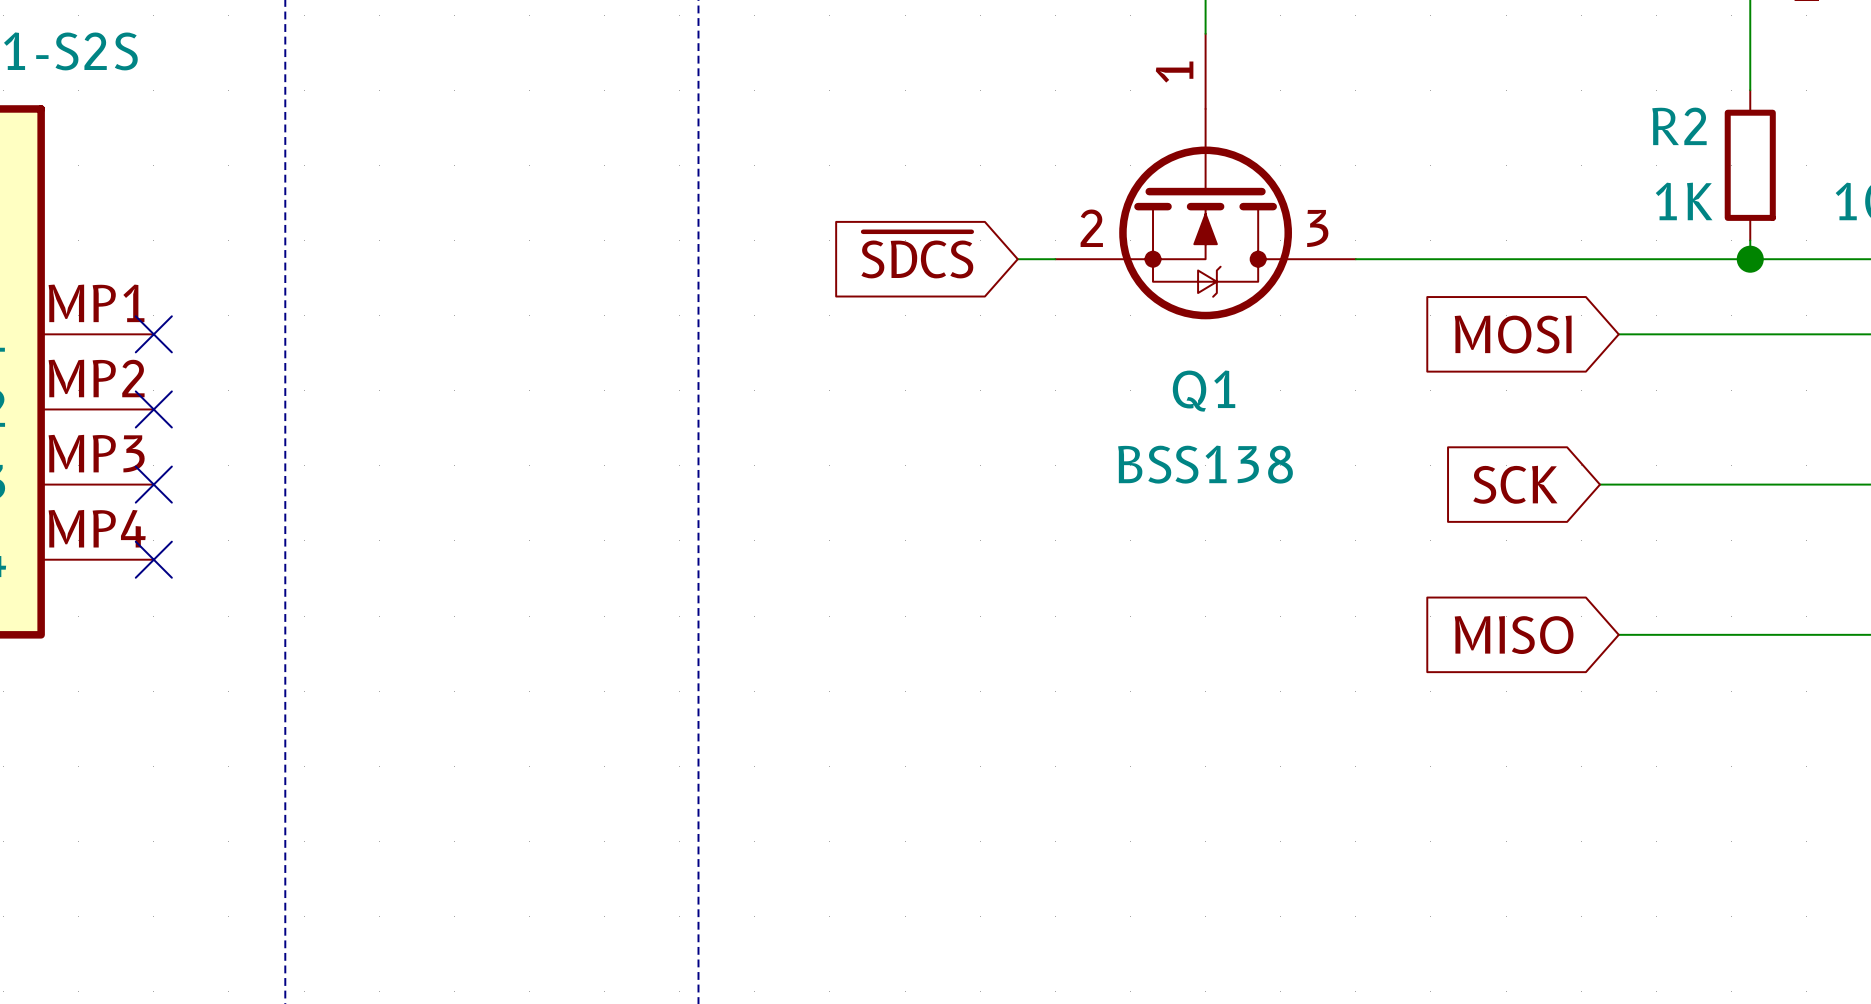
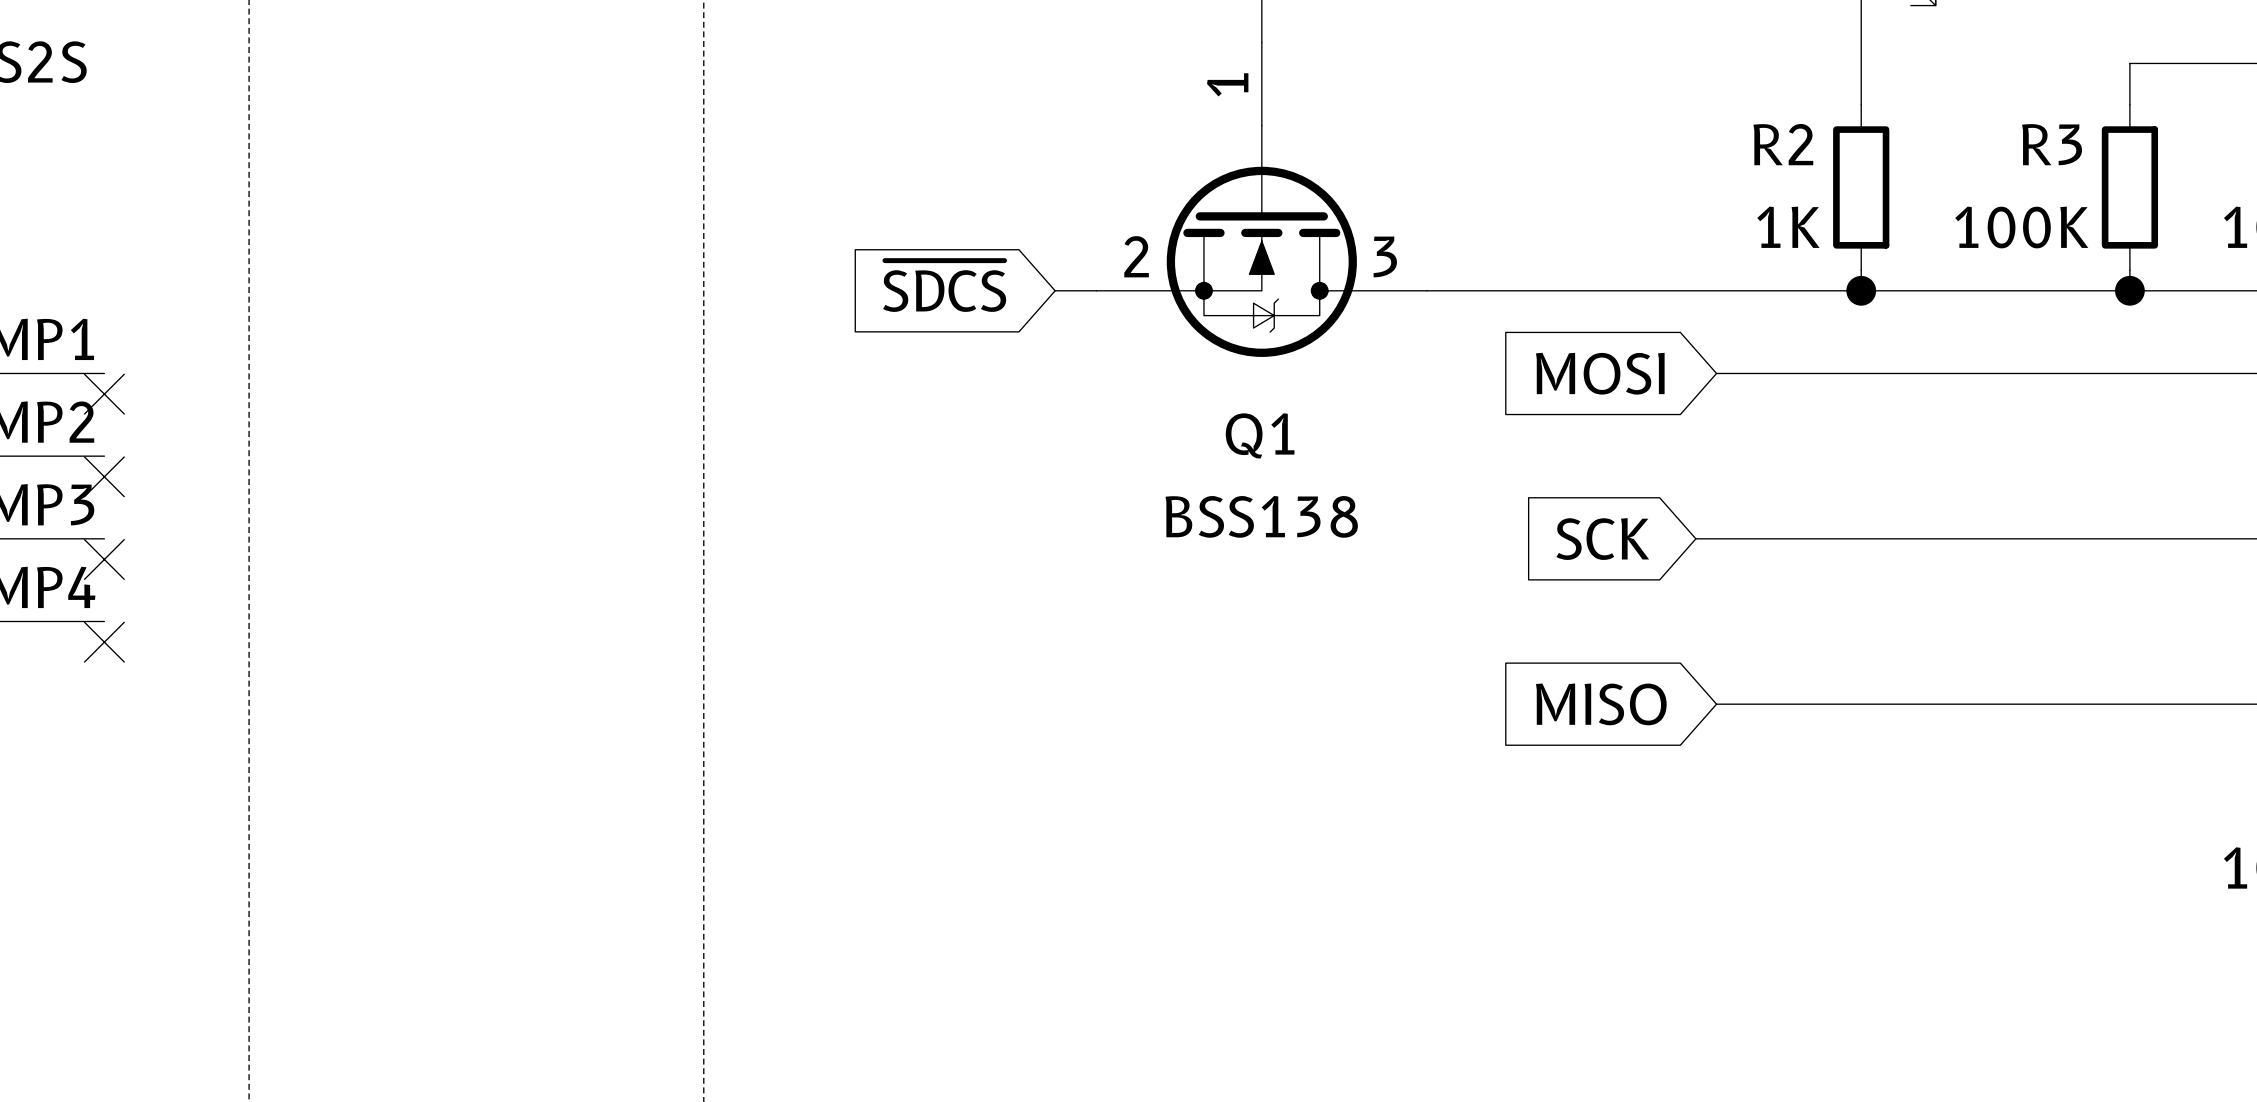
no-connect mark position: (153, 334) -> (104, 394)
no-connect mark position: (153, 409) -> (104, 476)
no-connect mark position: (153, 484) -> (104, 559)
no-connect mark position: (153, 559) -> (104, 642)

